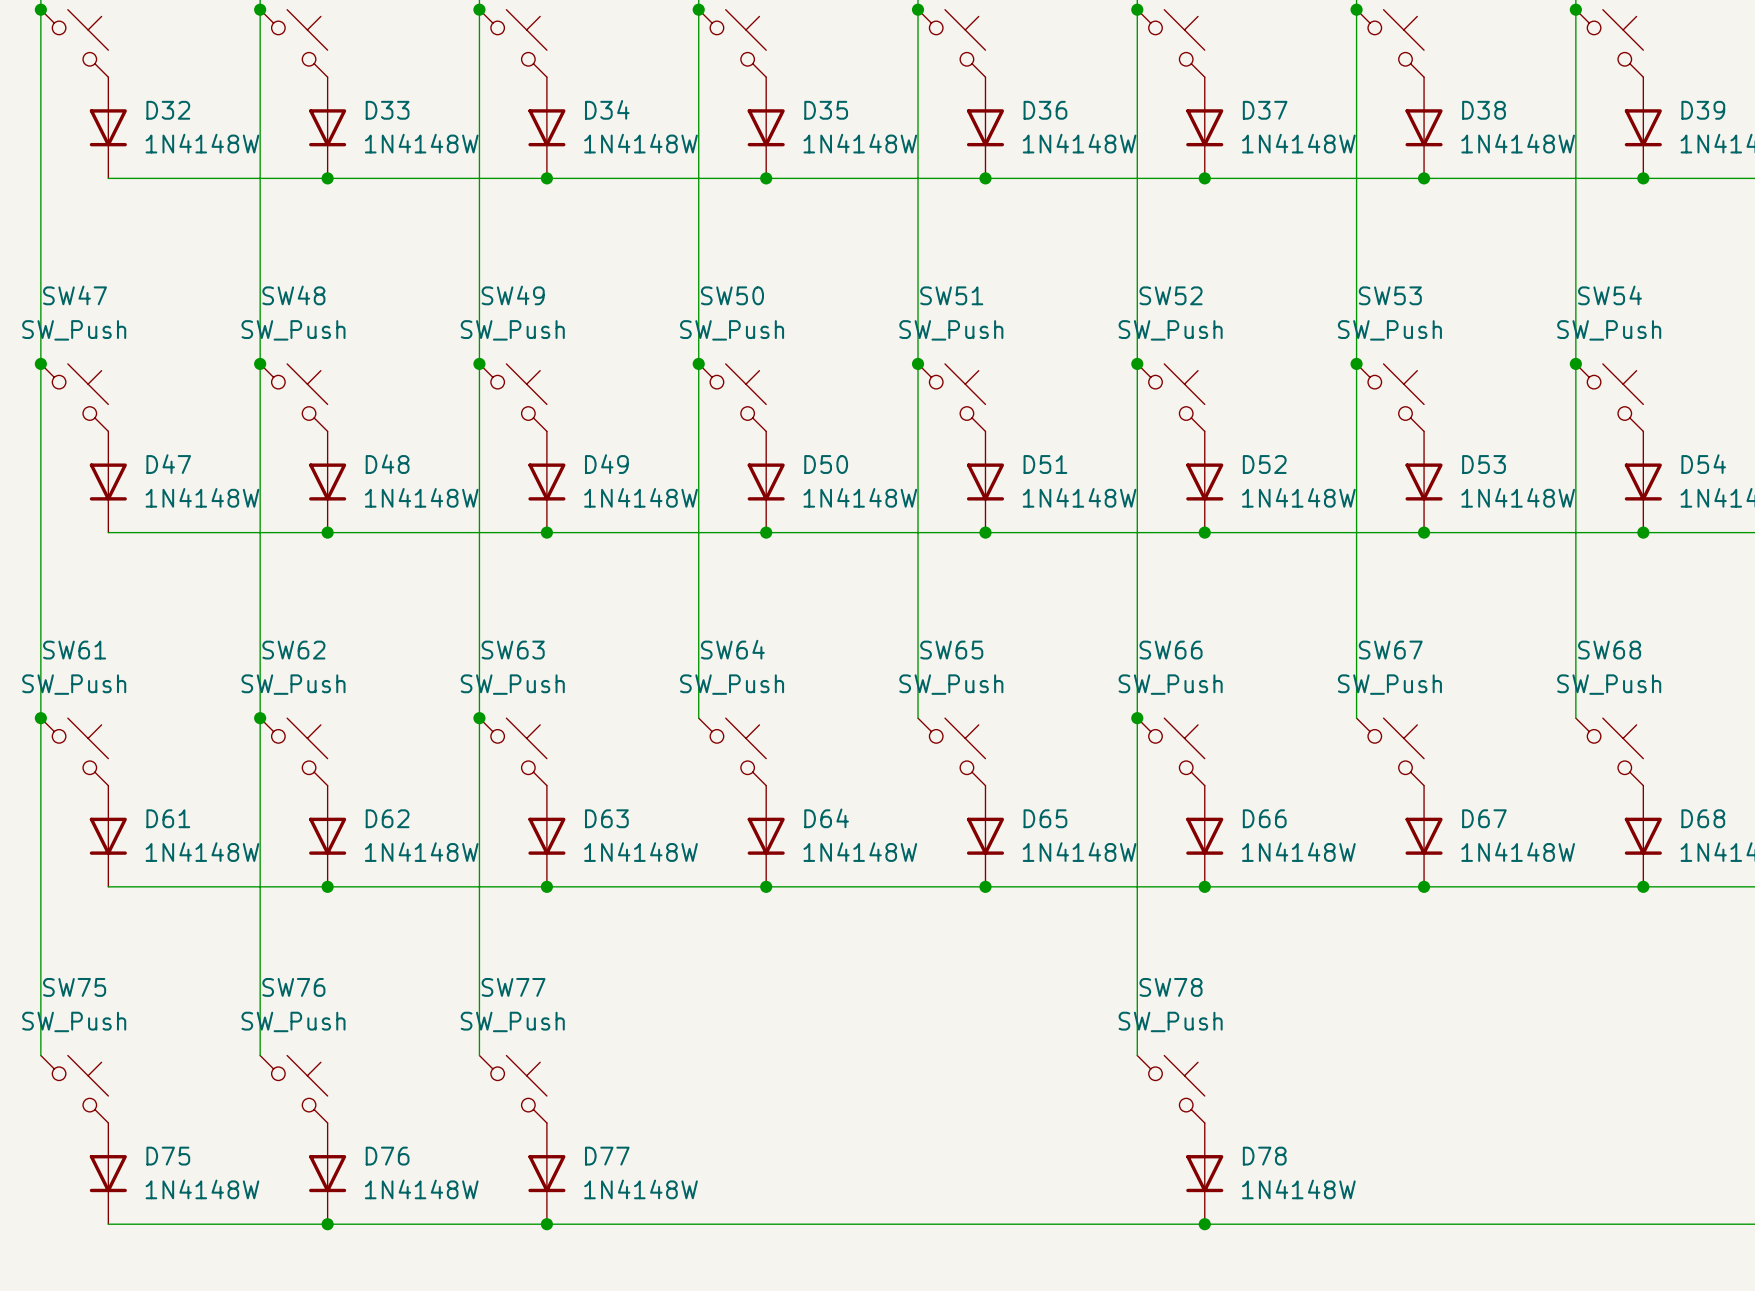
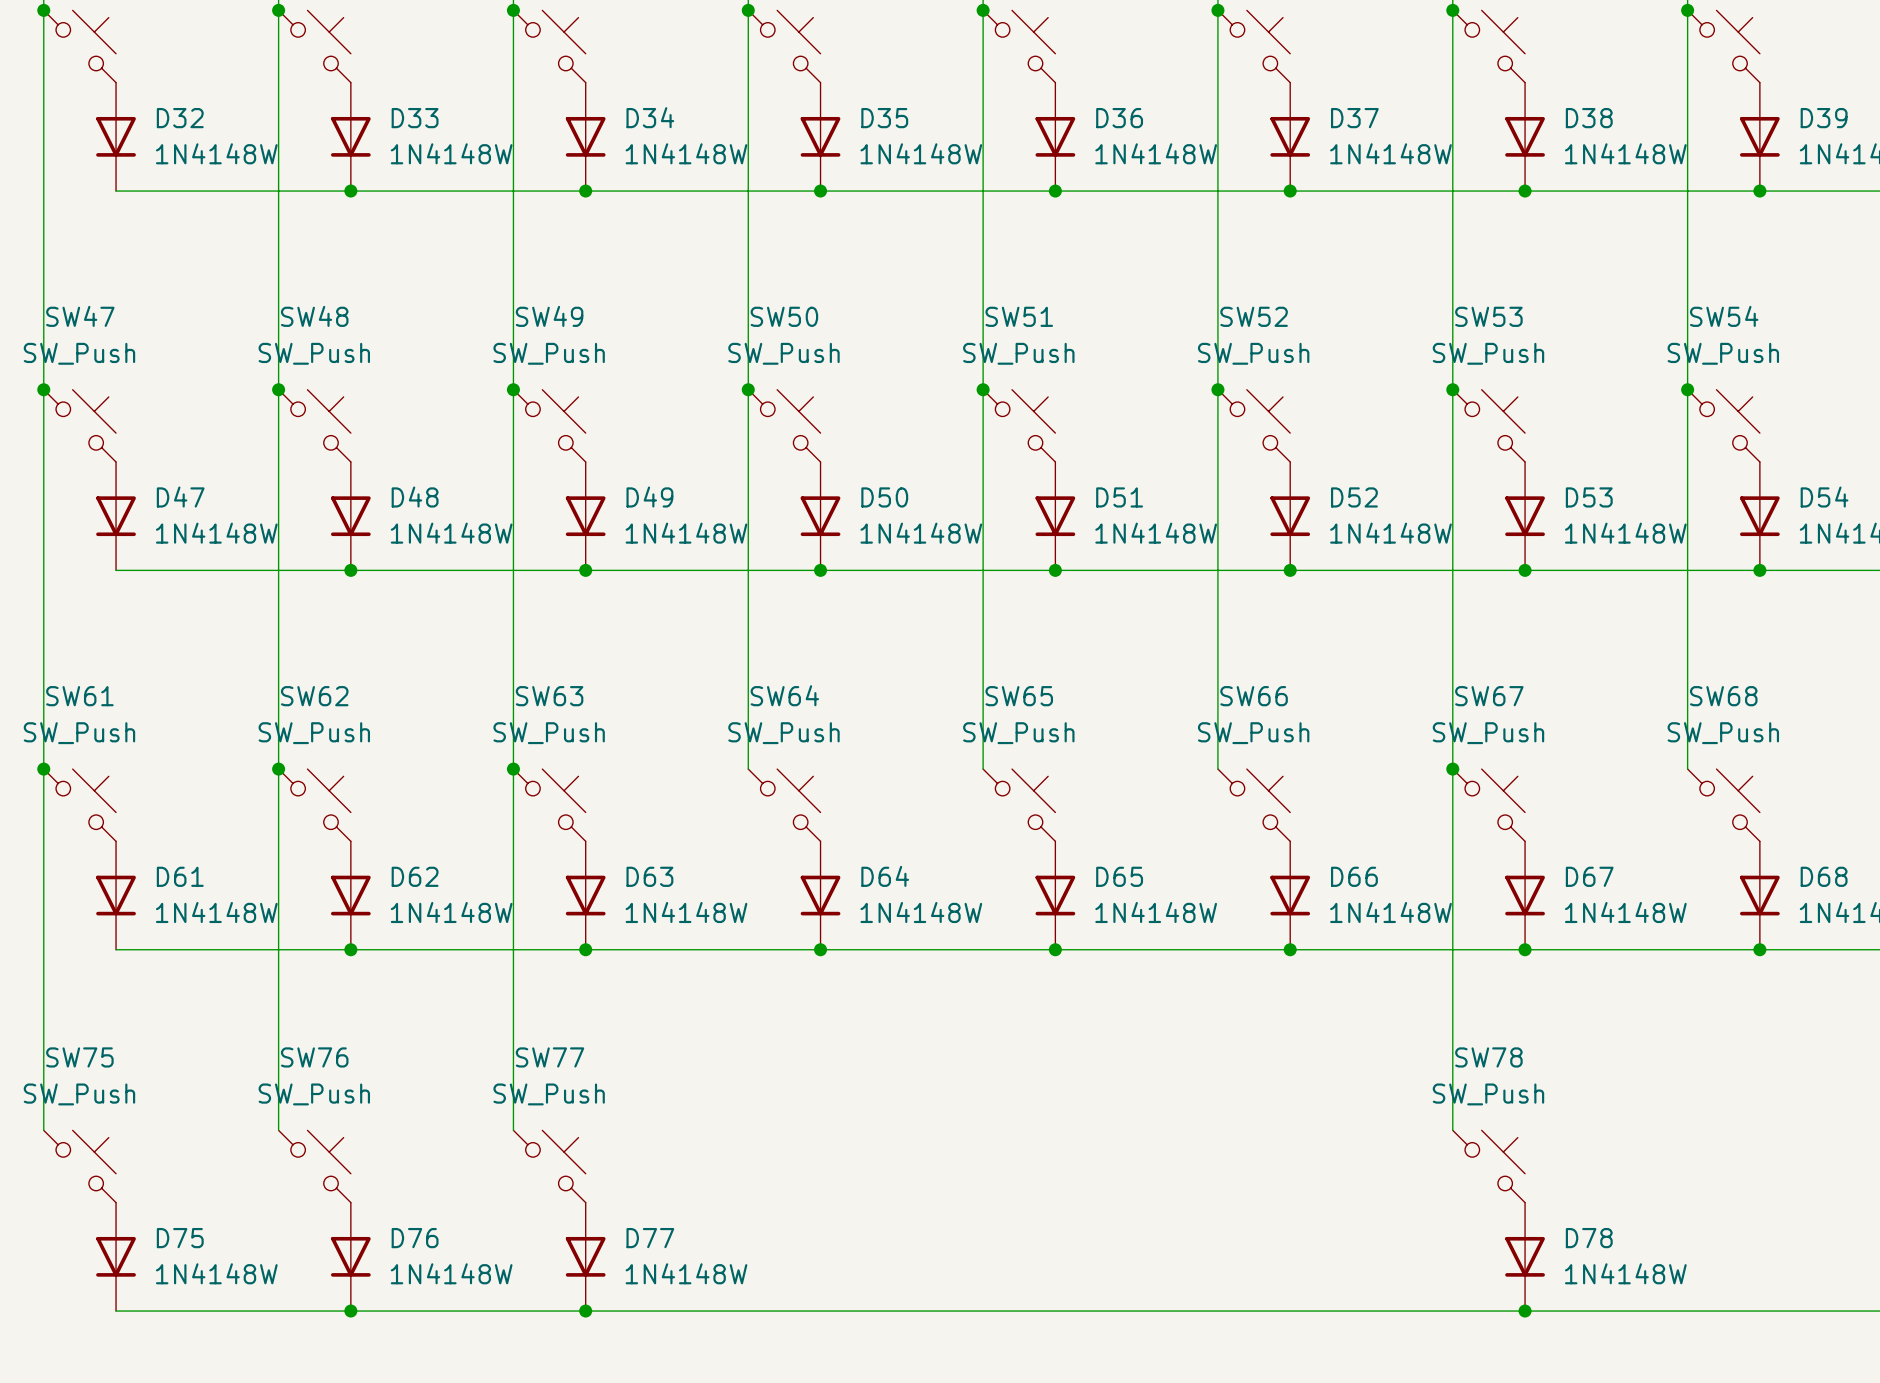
wire: (1137, 718) (1137, 1055) -> (1452, 769) (1452, 1130)
junction: (1137, 718) -> none
junction: none -> (1452, 769)
SW78 position: (1171, 1089) -> (1488, 1166)
D78 position: (1204, 1173) -> (1525, 1256)
junction: (1204, 1224) -> none
junction: none -> (1525, 1311)

